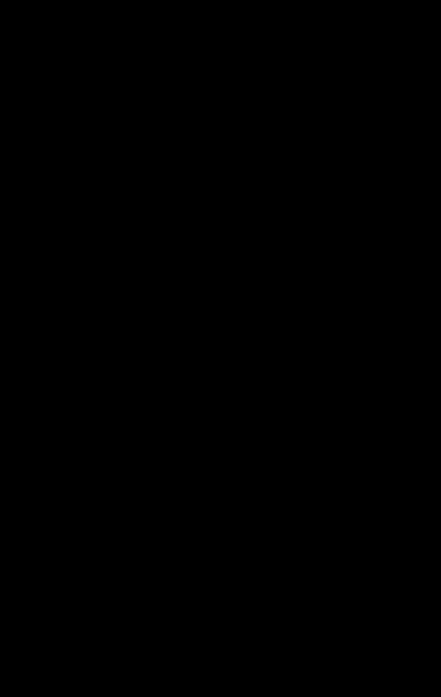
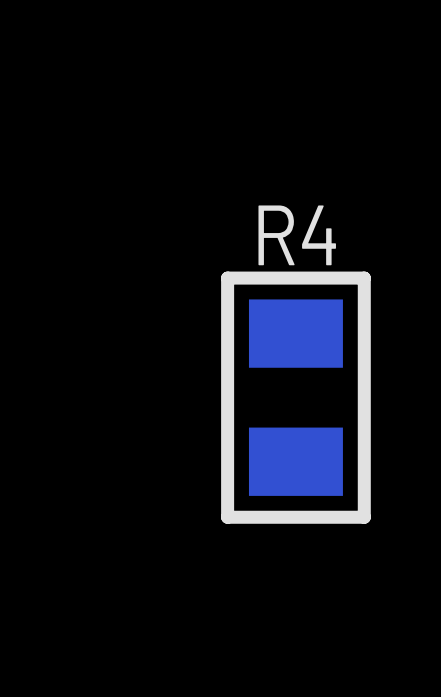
R4: none -> (295, 397)

